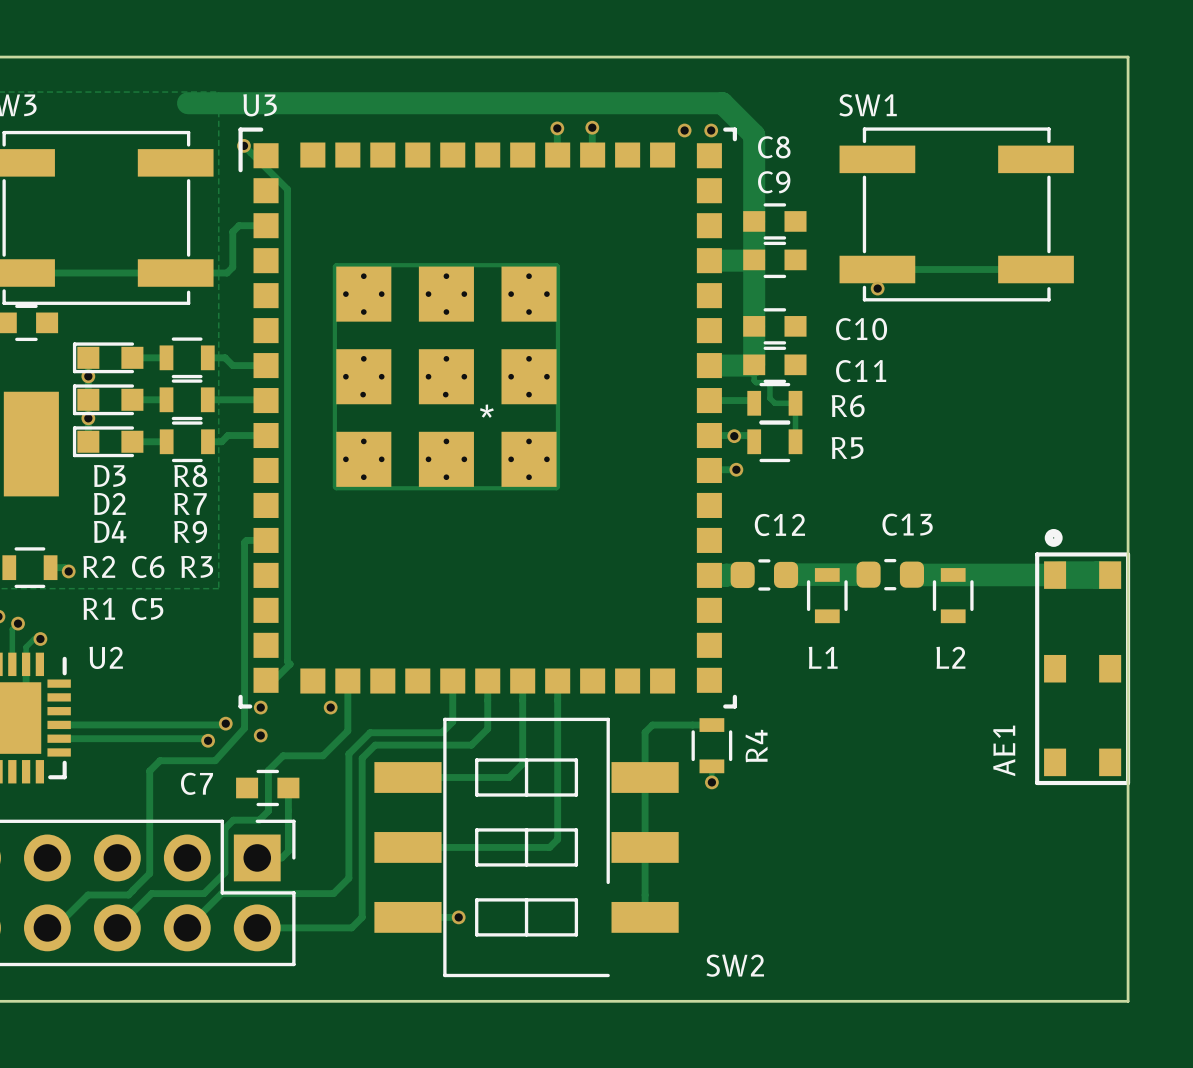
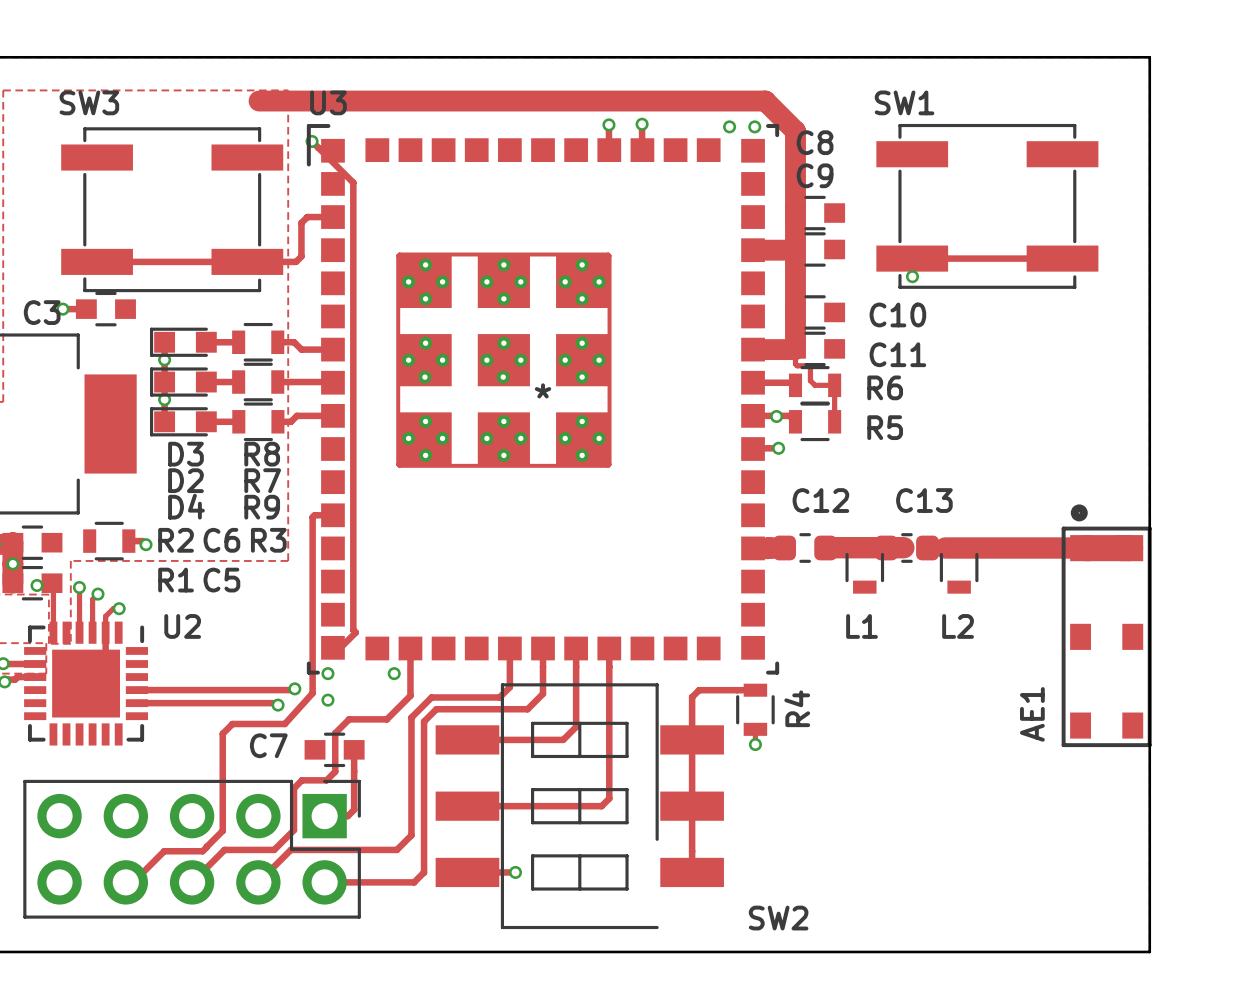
C13 position: (890, 574) -> (906, 548)
L2 position: (953, 595) -> (959, 567)

